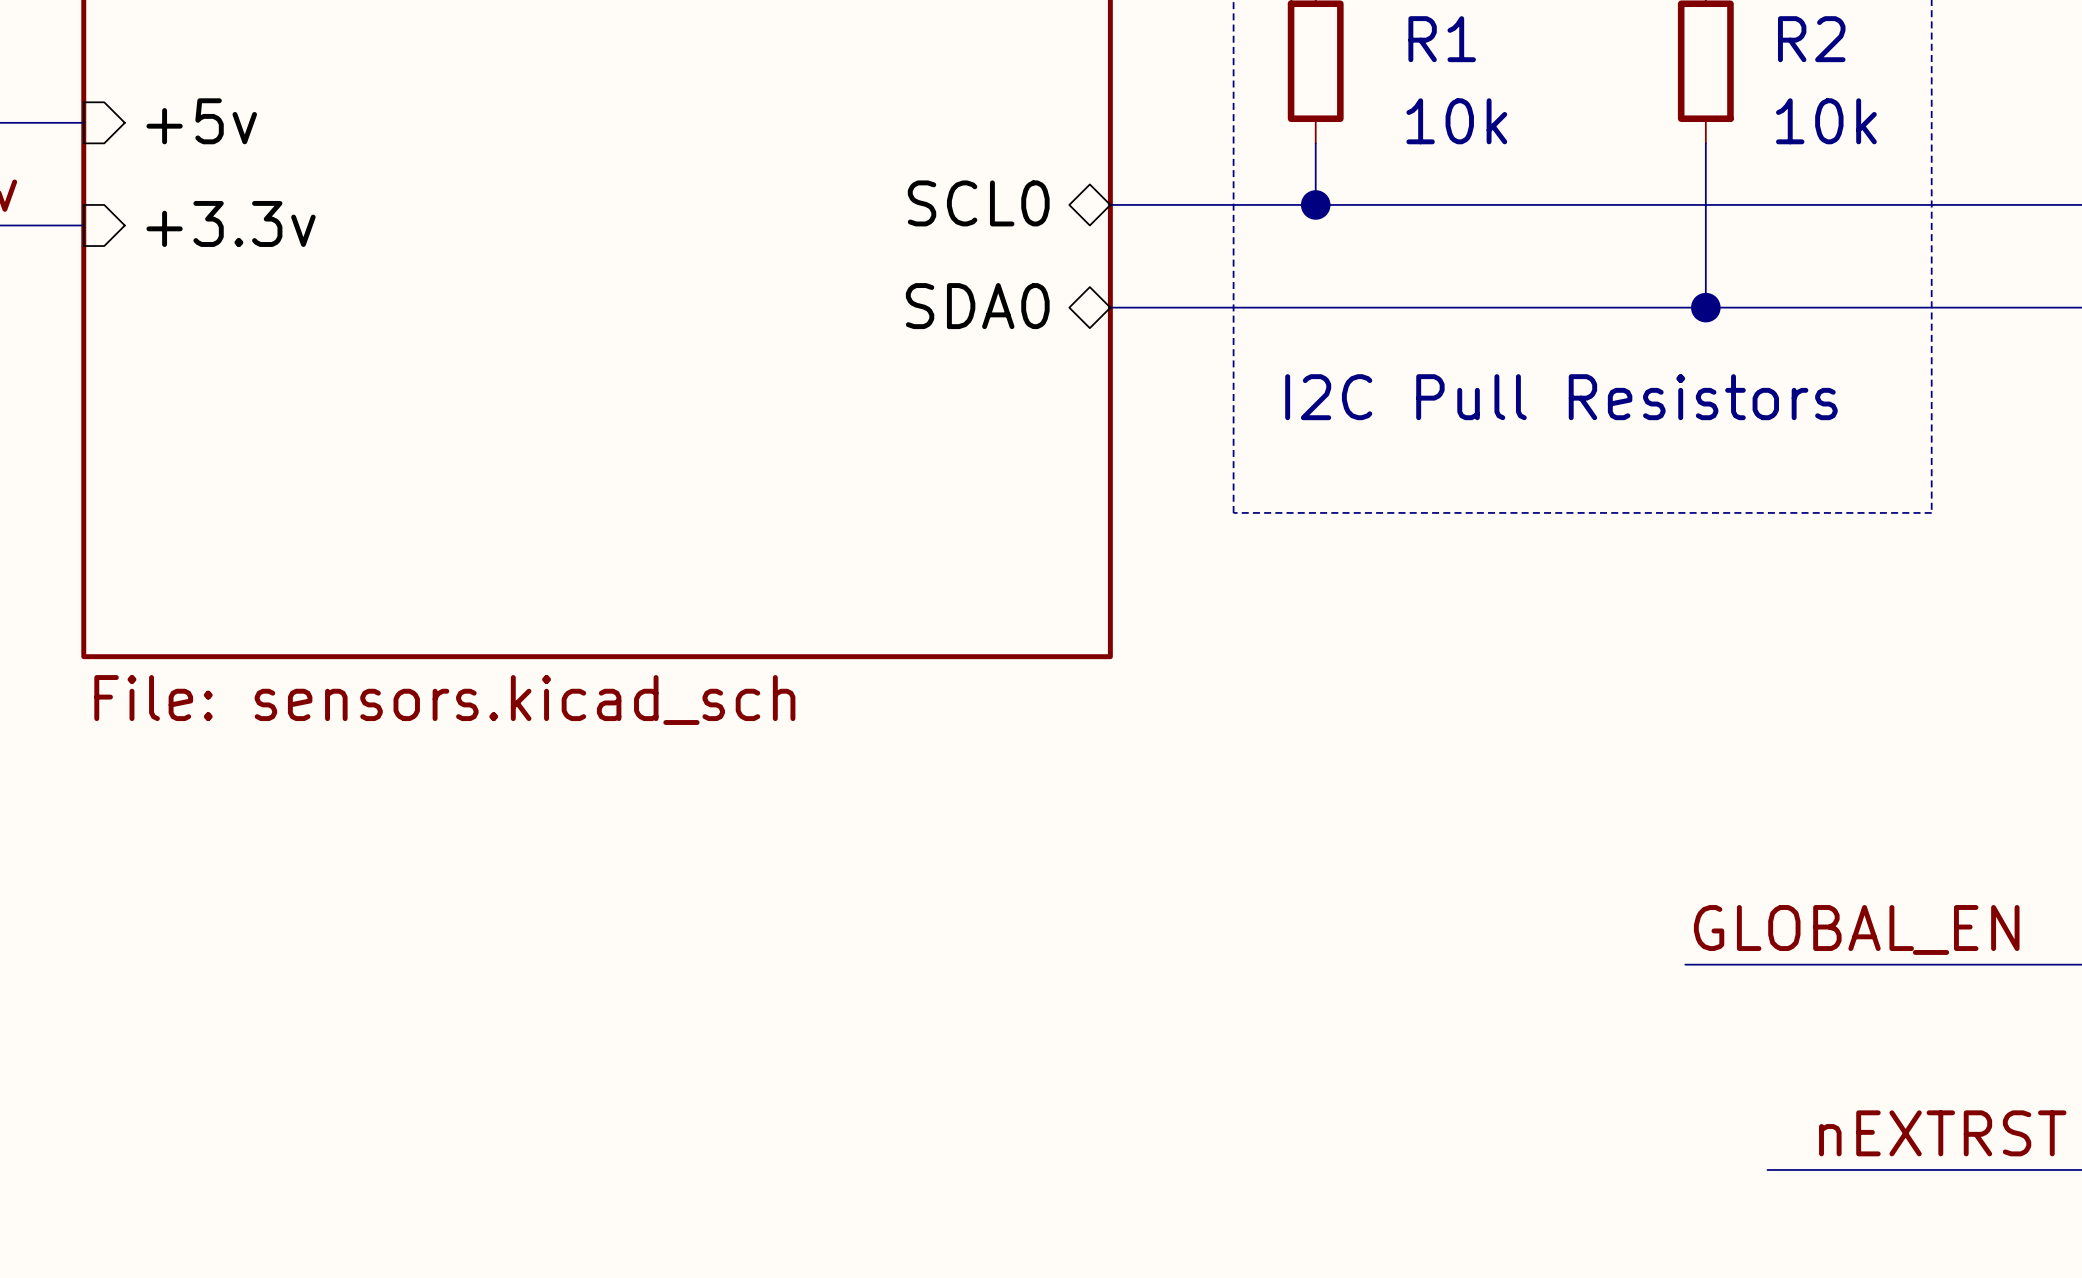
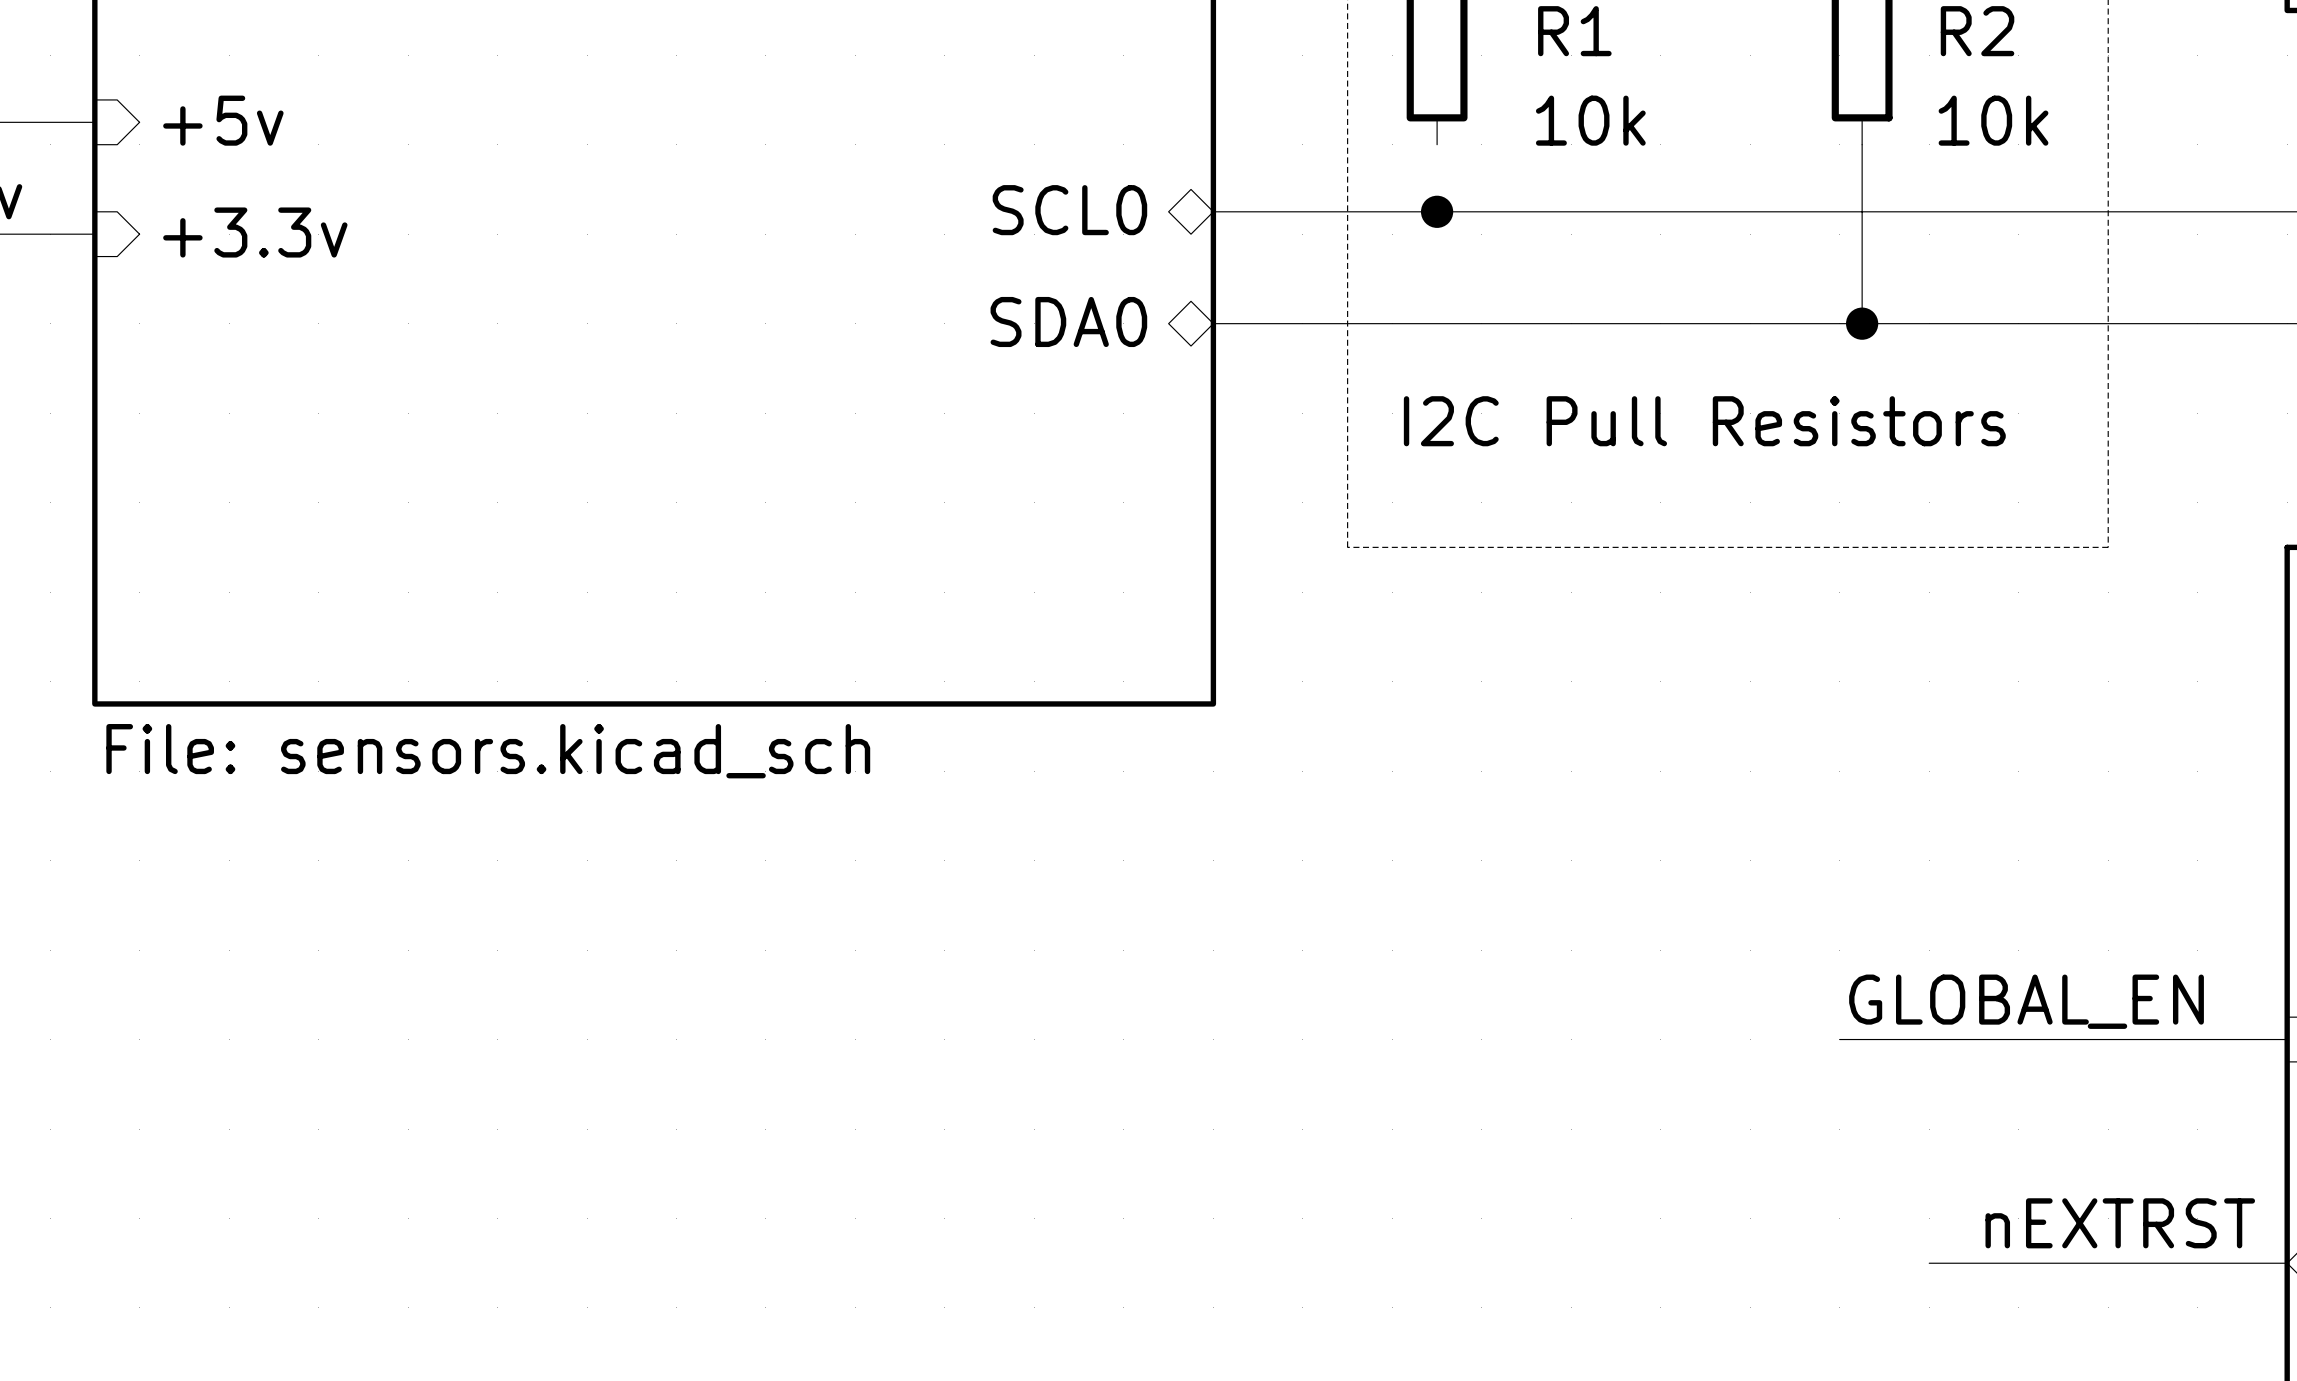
wire: (1315, 143) (1315, 204) -> none

